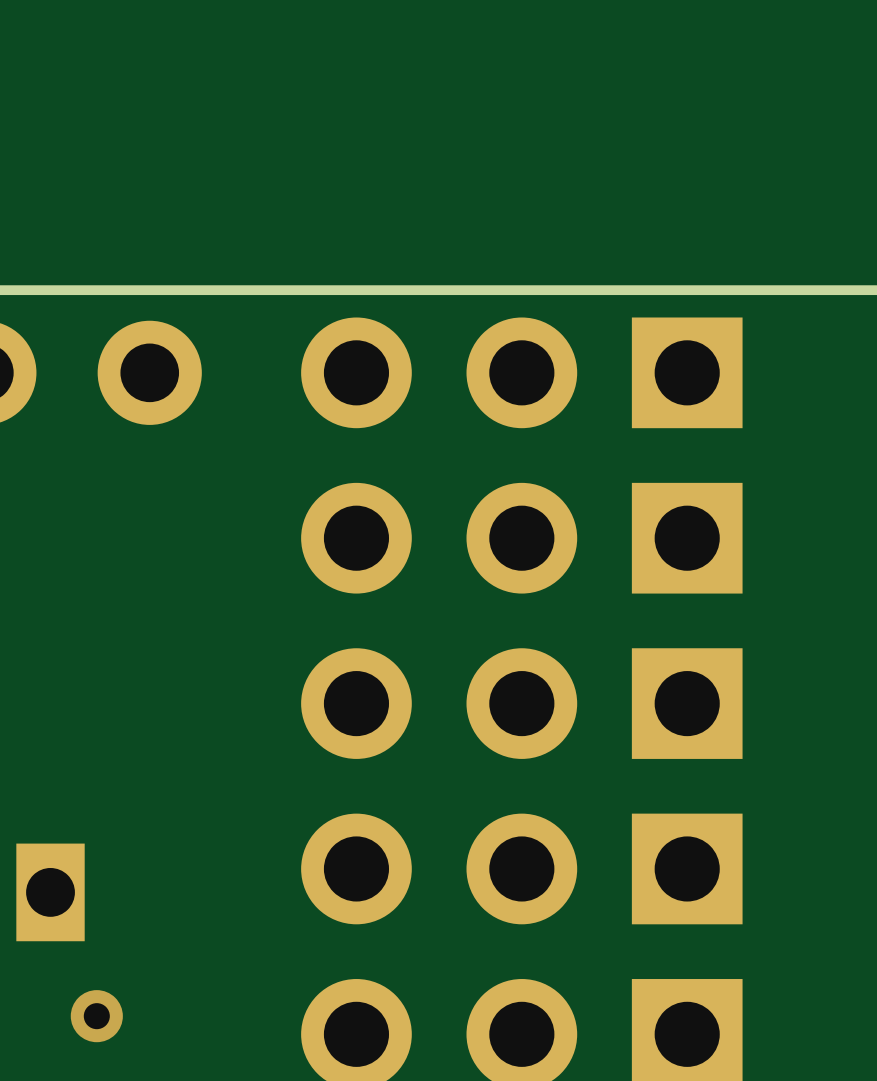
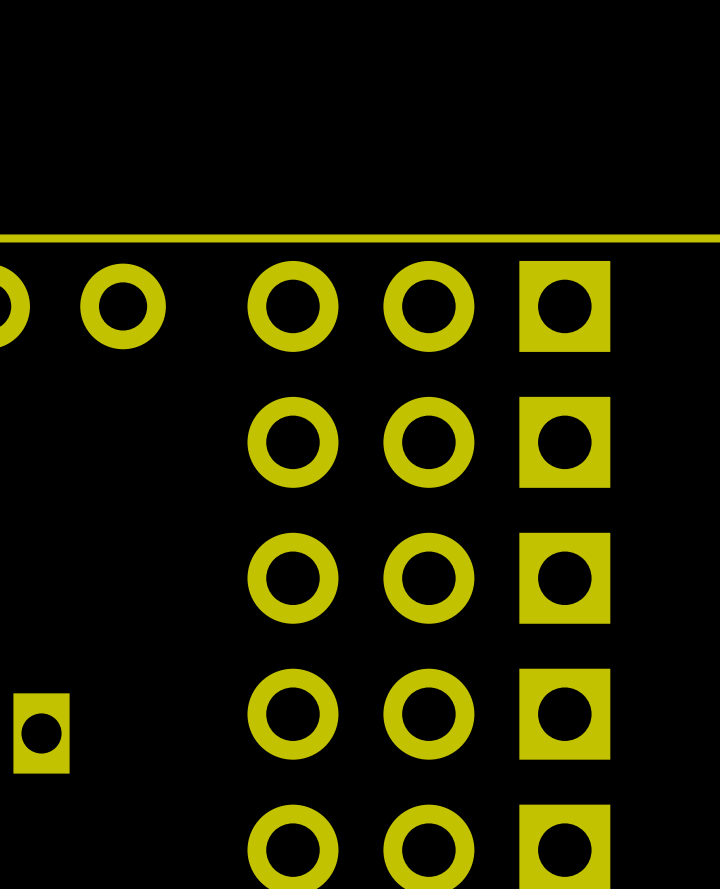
via: (96, 1016) -> none

